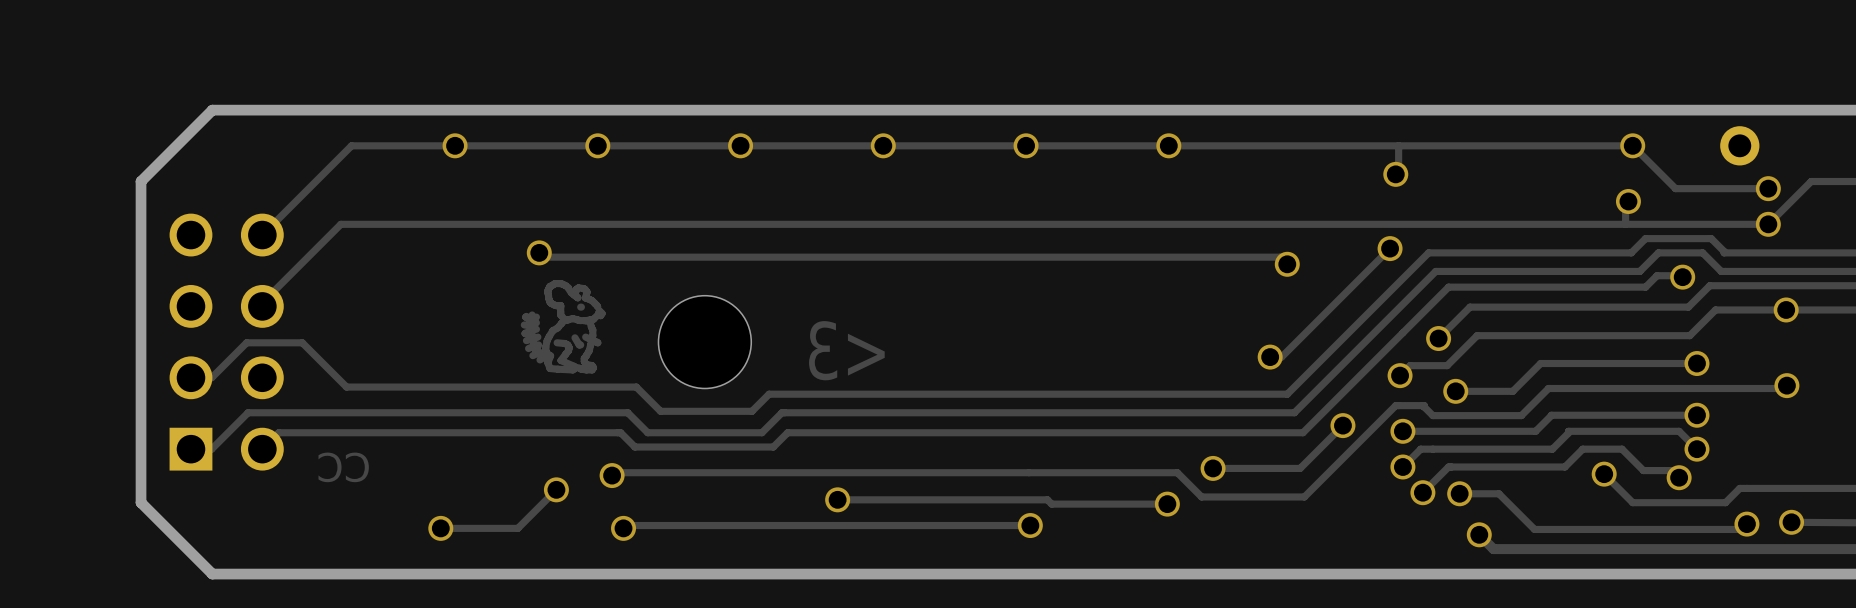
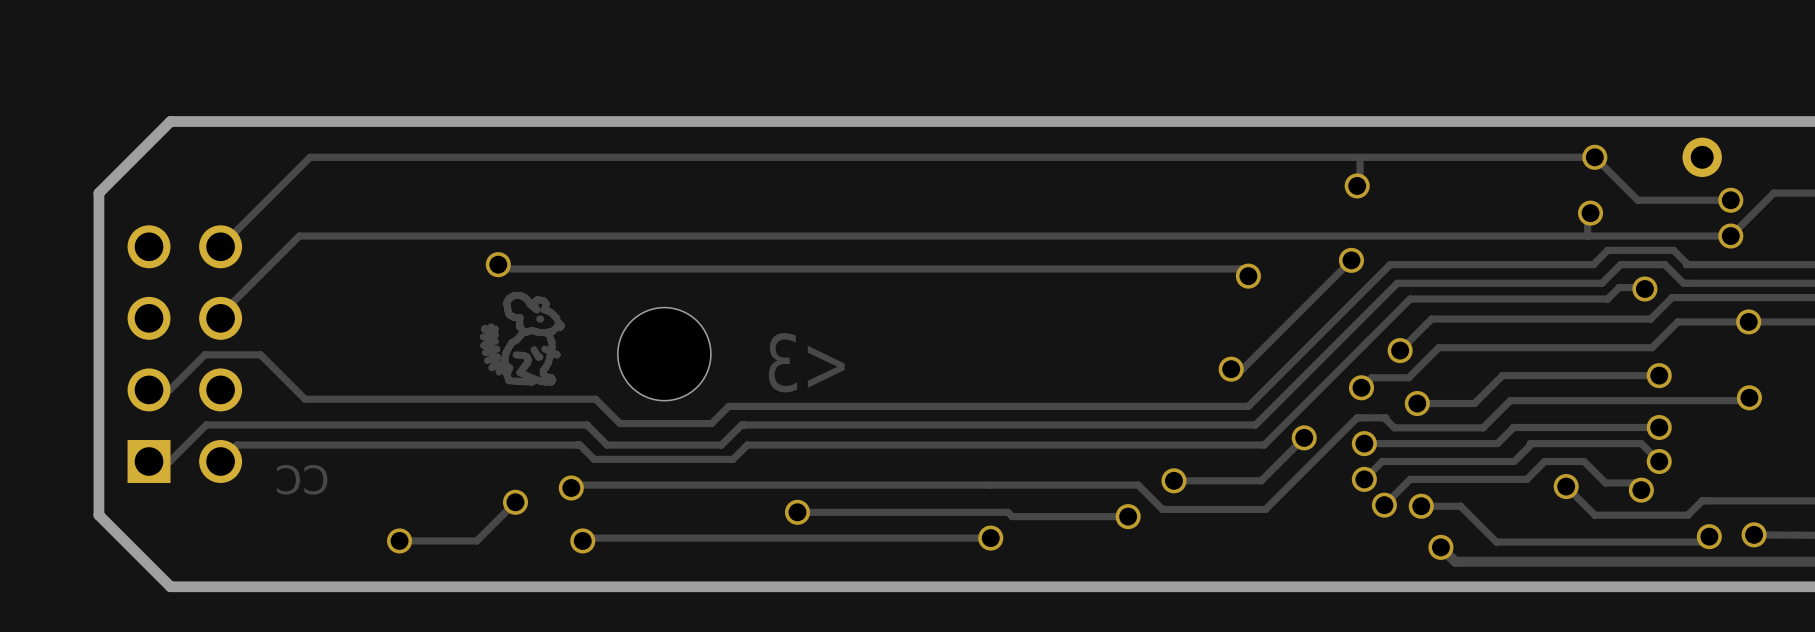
via: (455, 145) -> none
via: (597, 145) -> none
via: (740, 145) -> none
via: (883, 145) -> none
via: (1026, 145) -> none
via: (1168, 145) -> none

